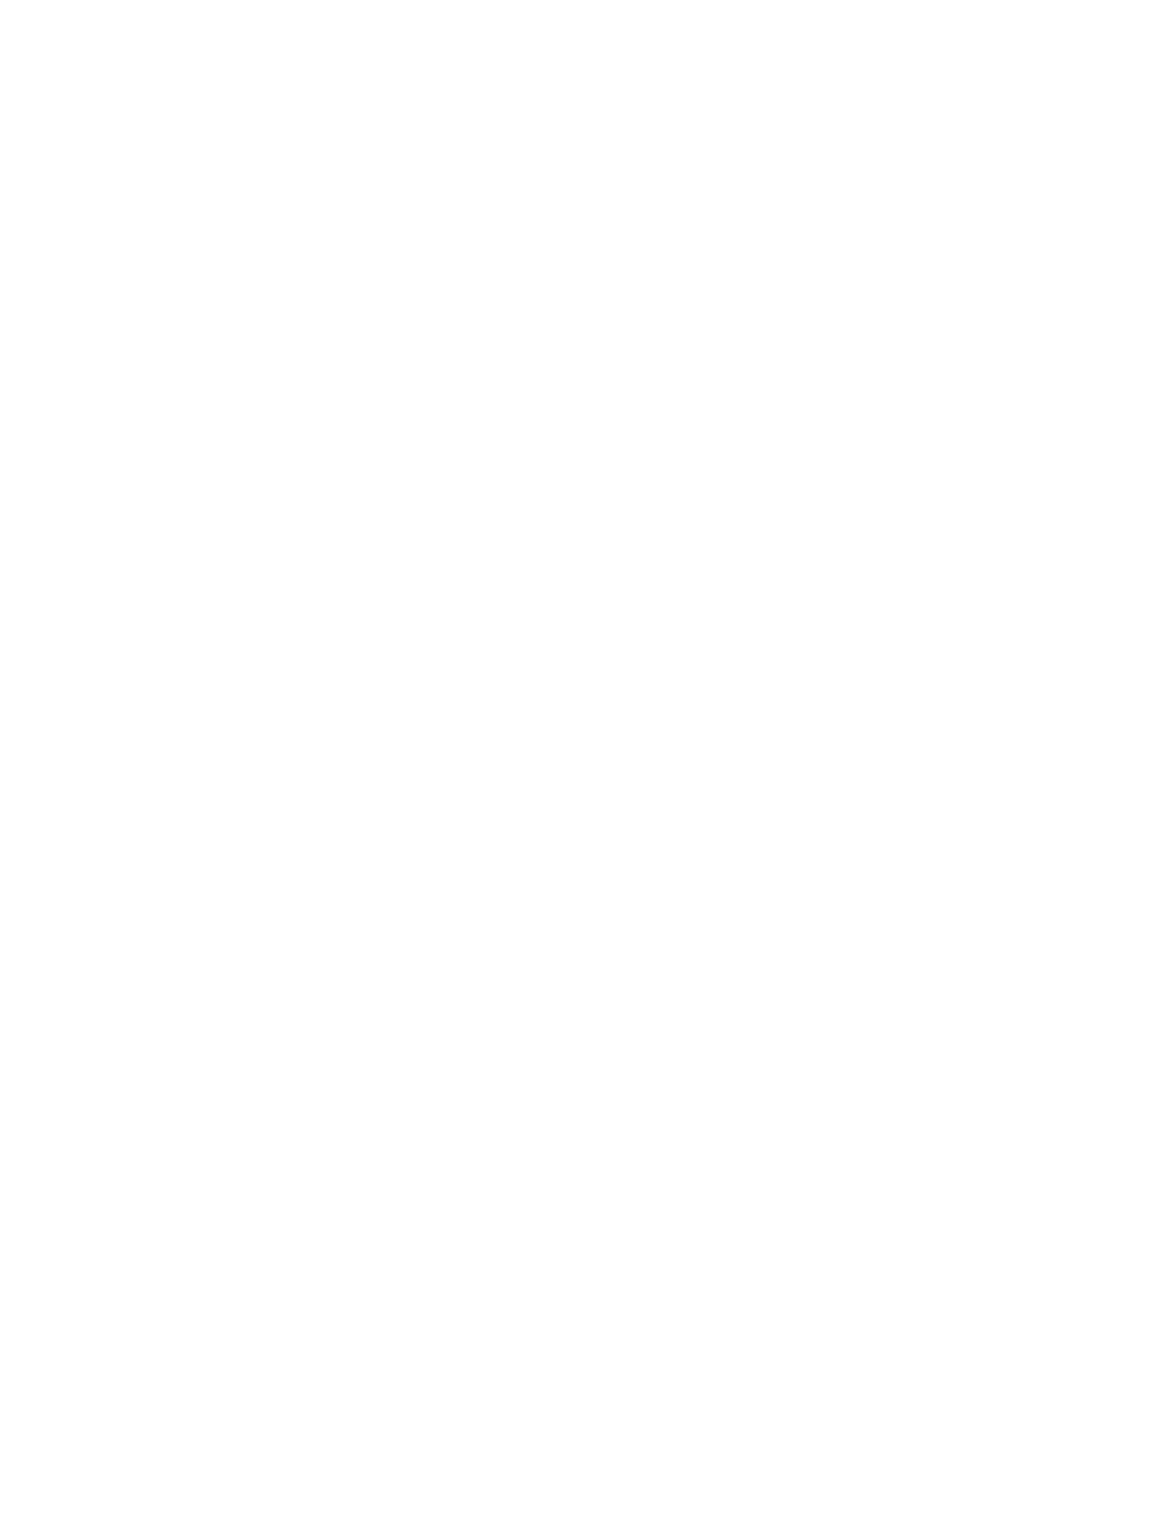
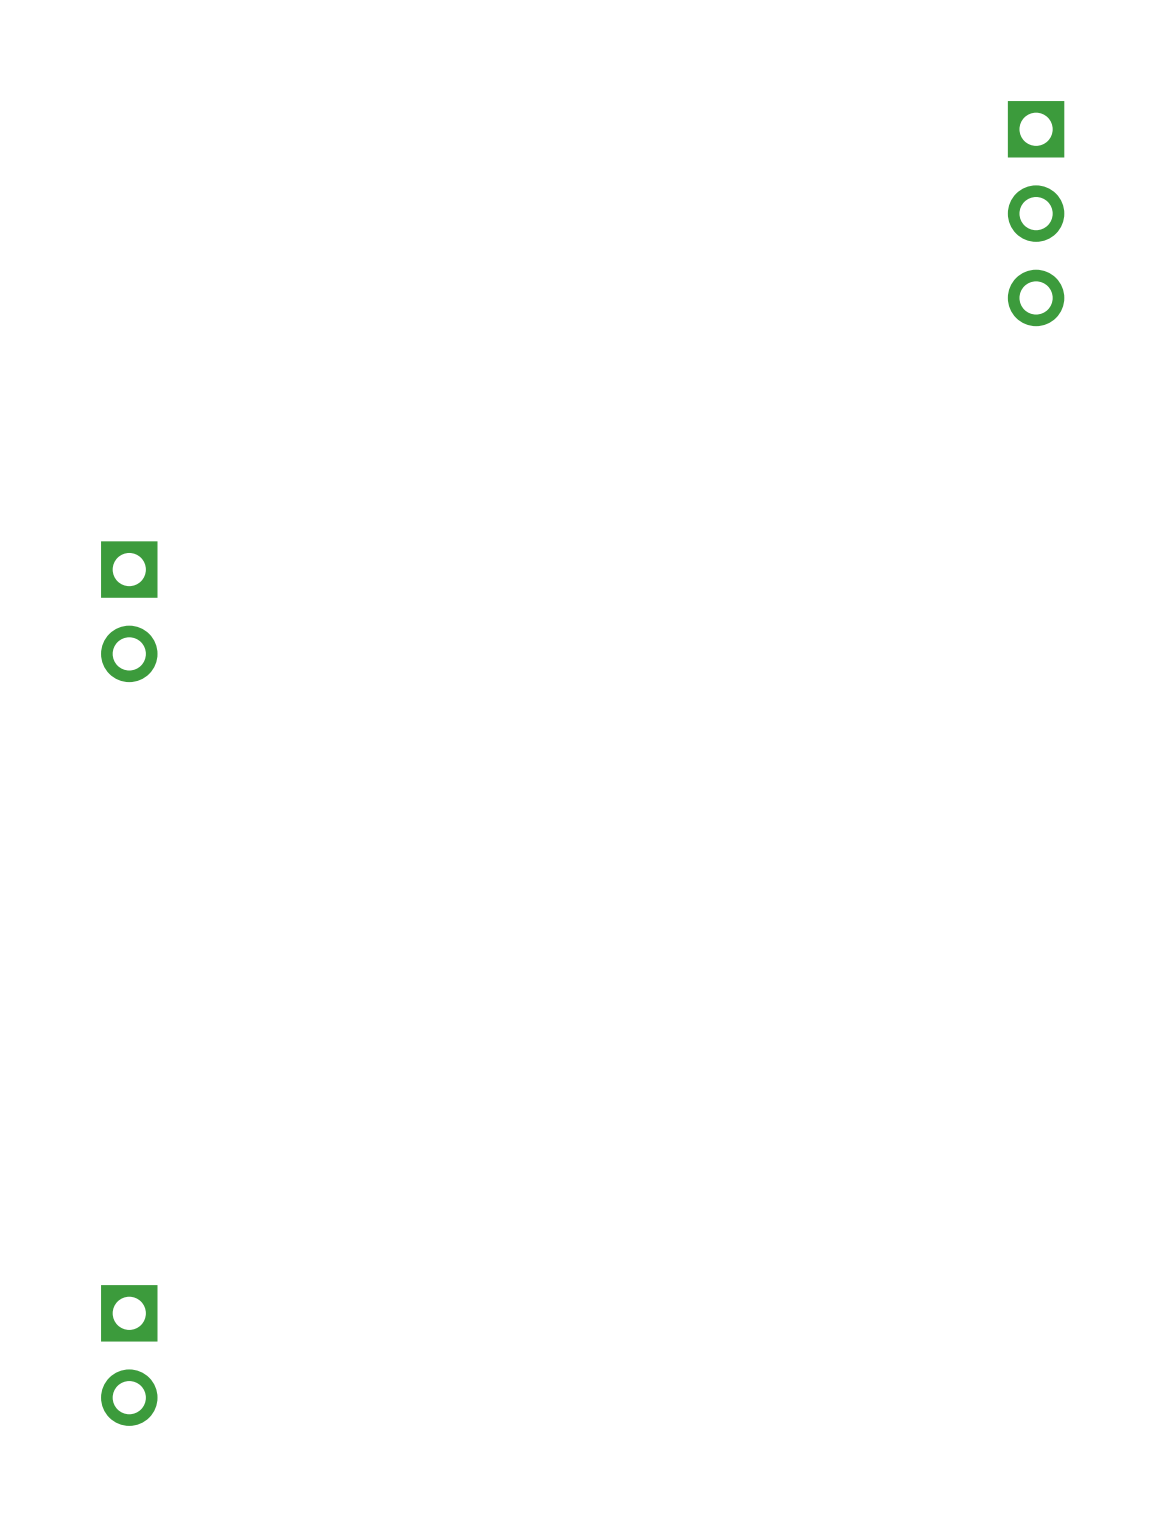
part: none -> (1036, 213)
part: none -> (129, 611)
part: none -> (129, 1355)

